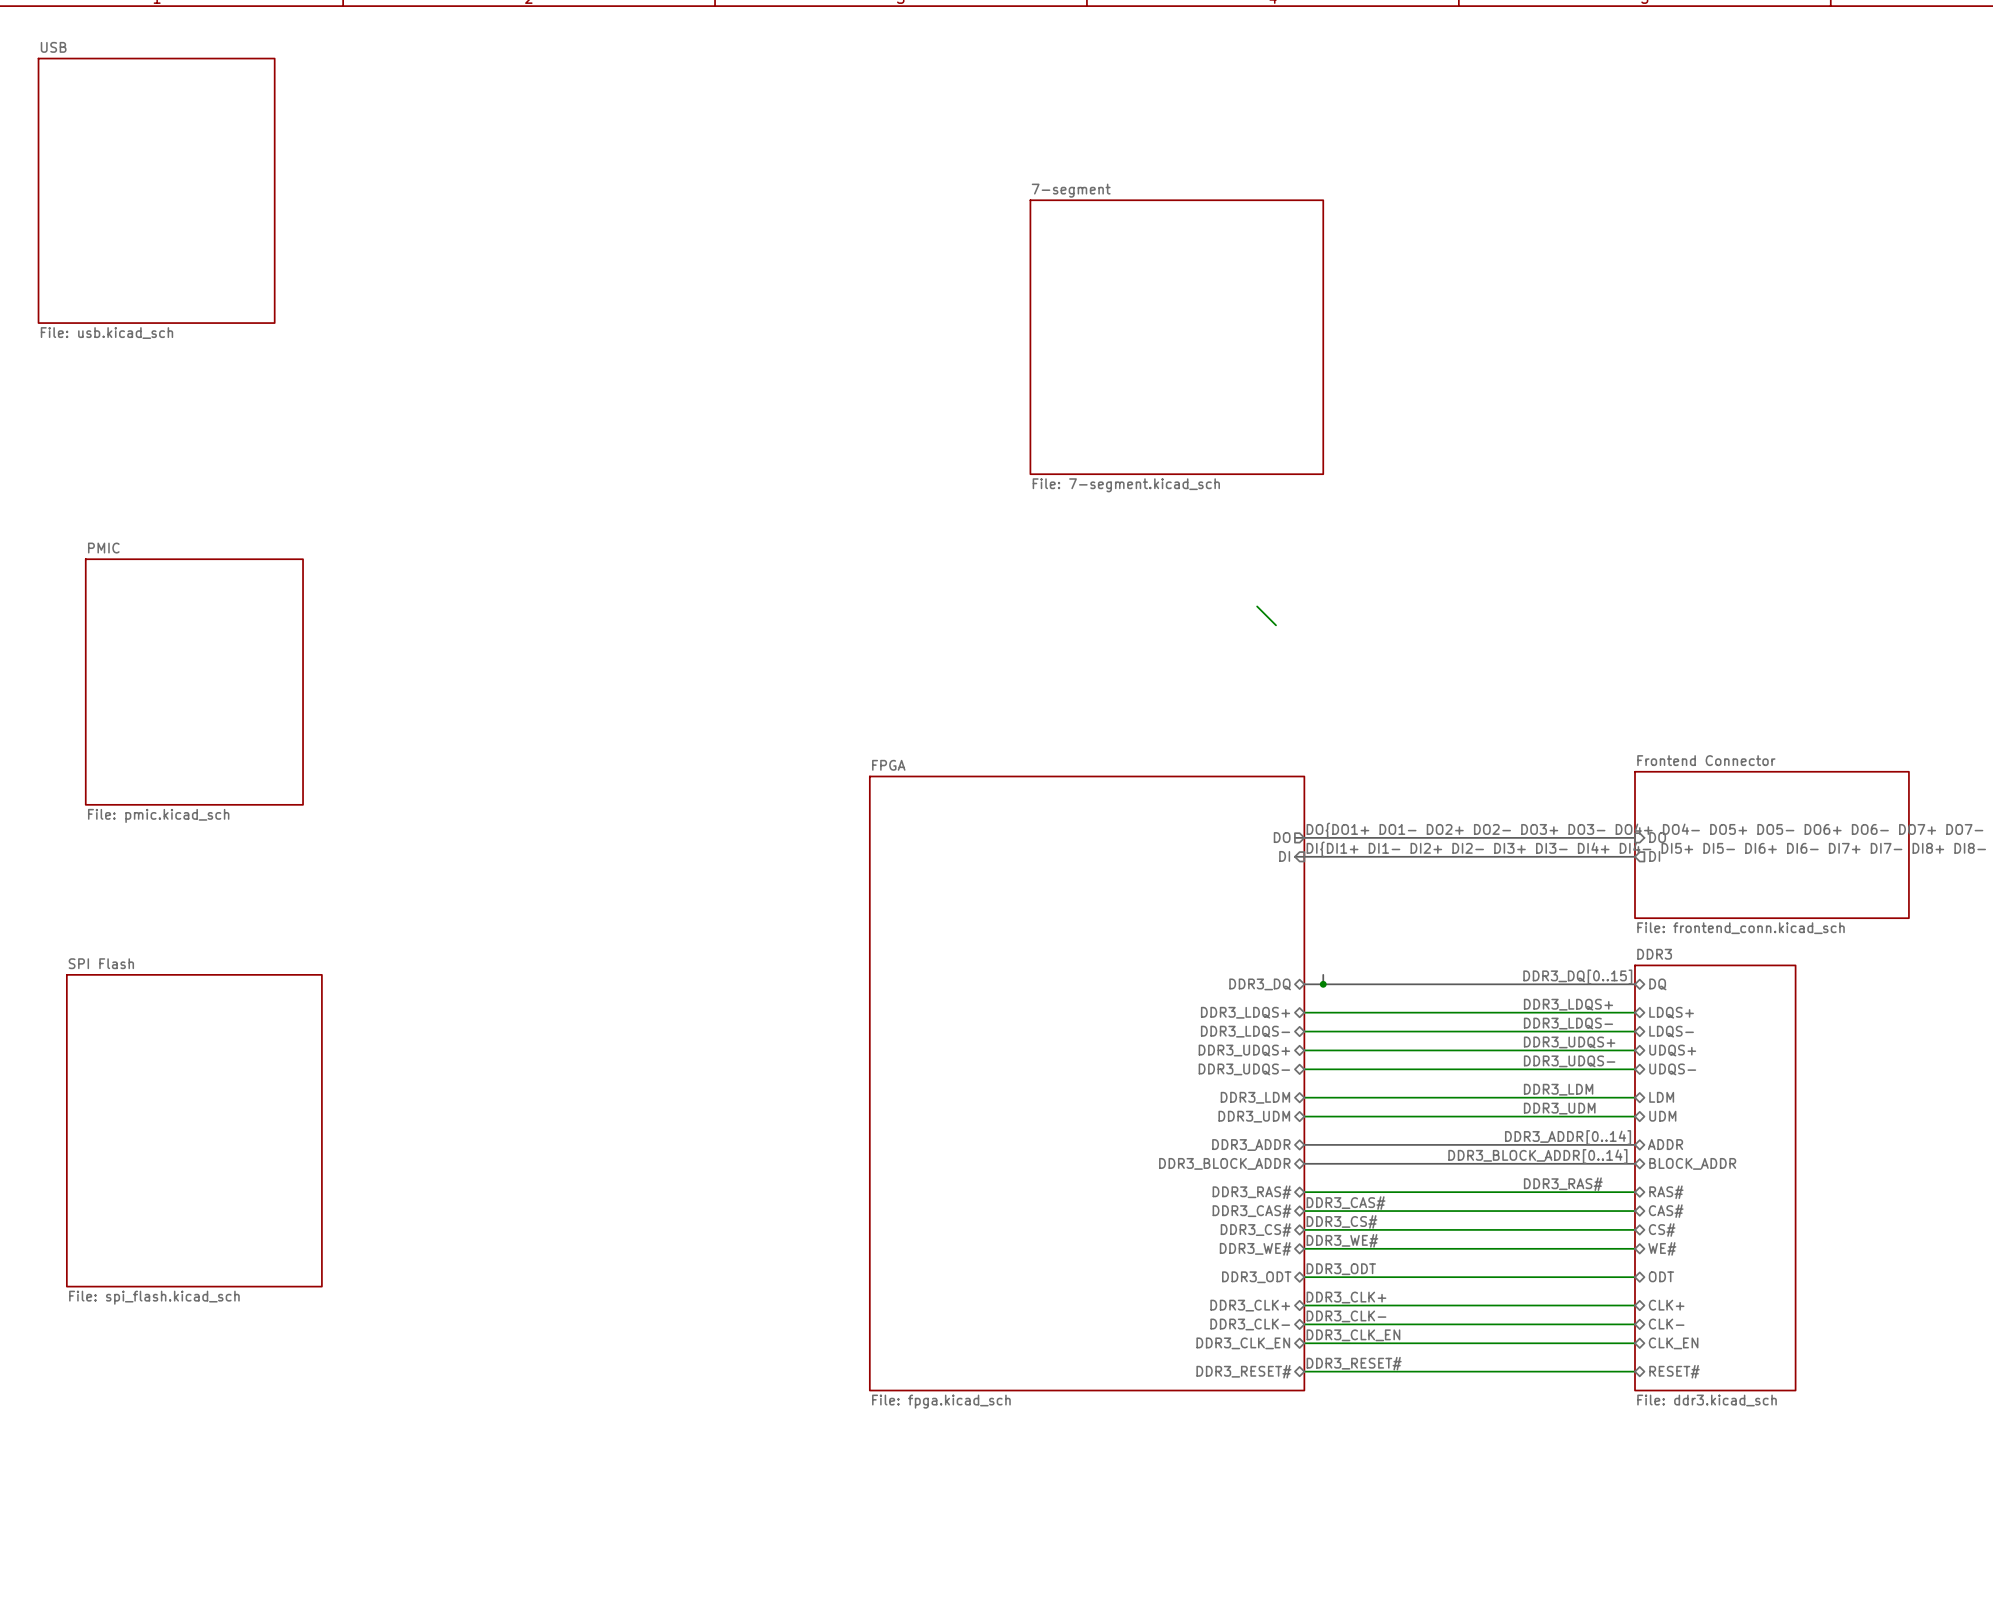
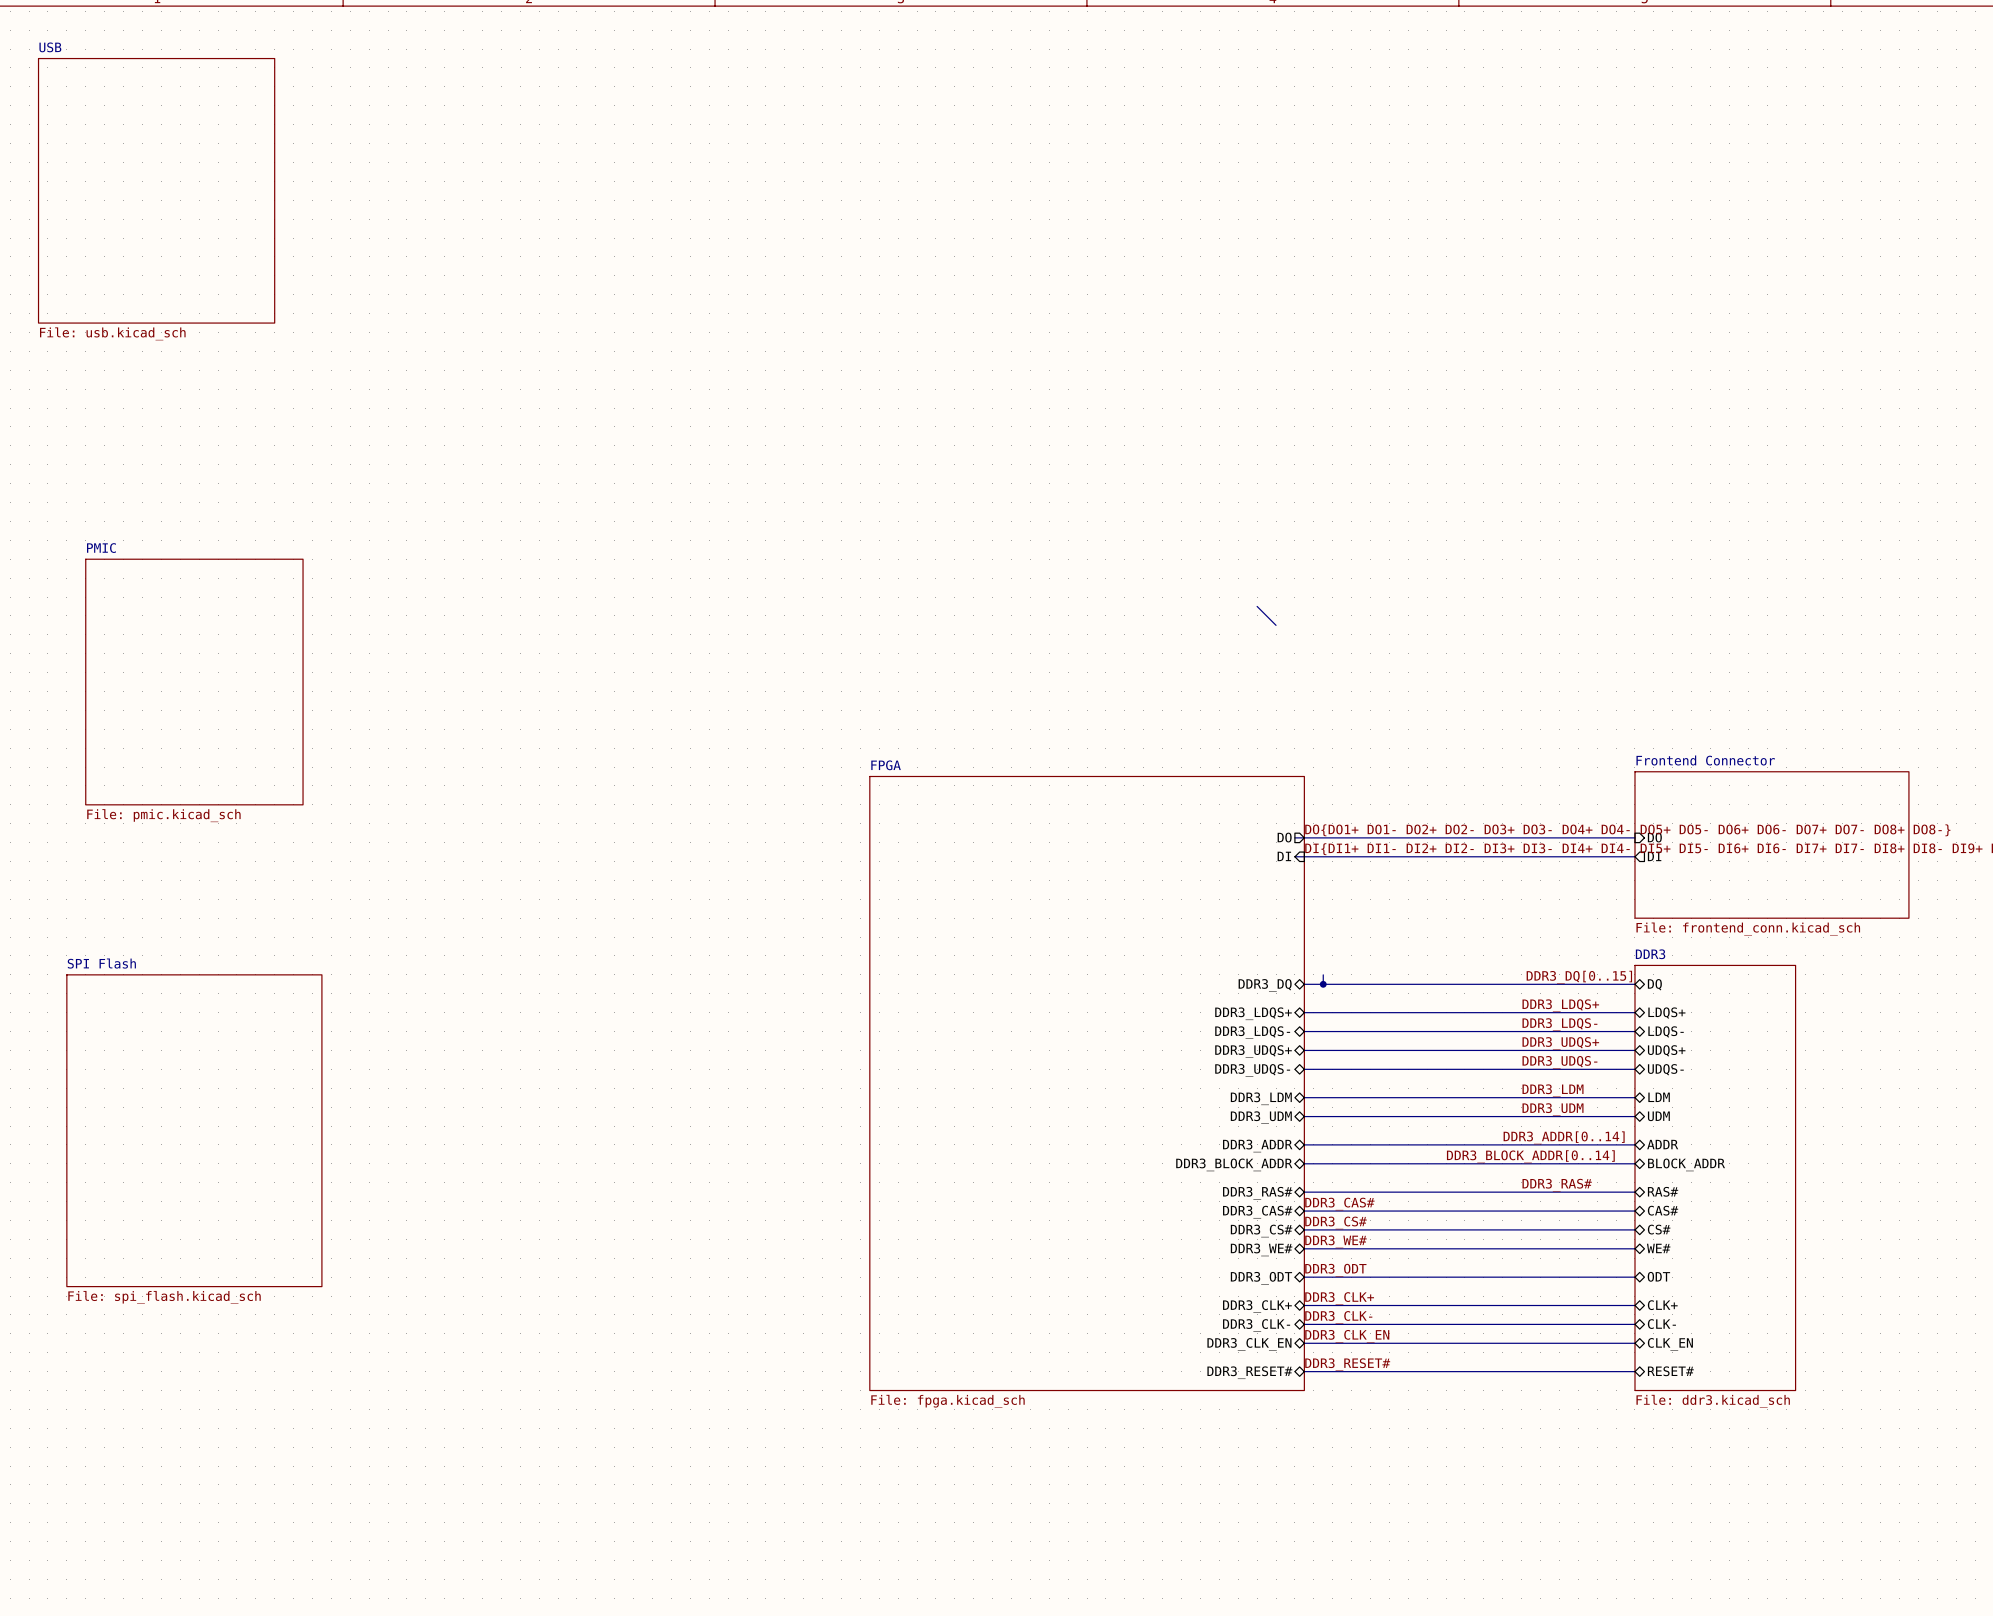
sheet 7-segment: File: 7-segment.kicad_sch (1176, 337) -> none

